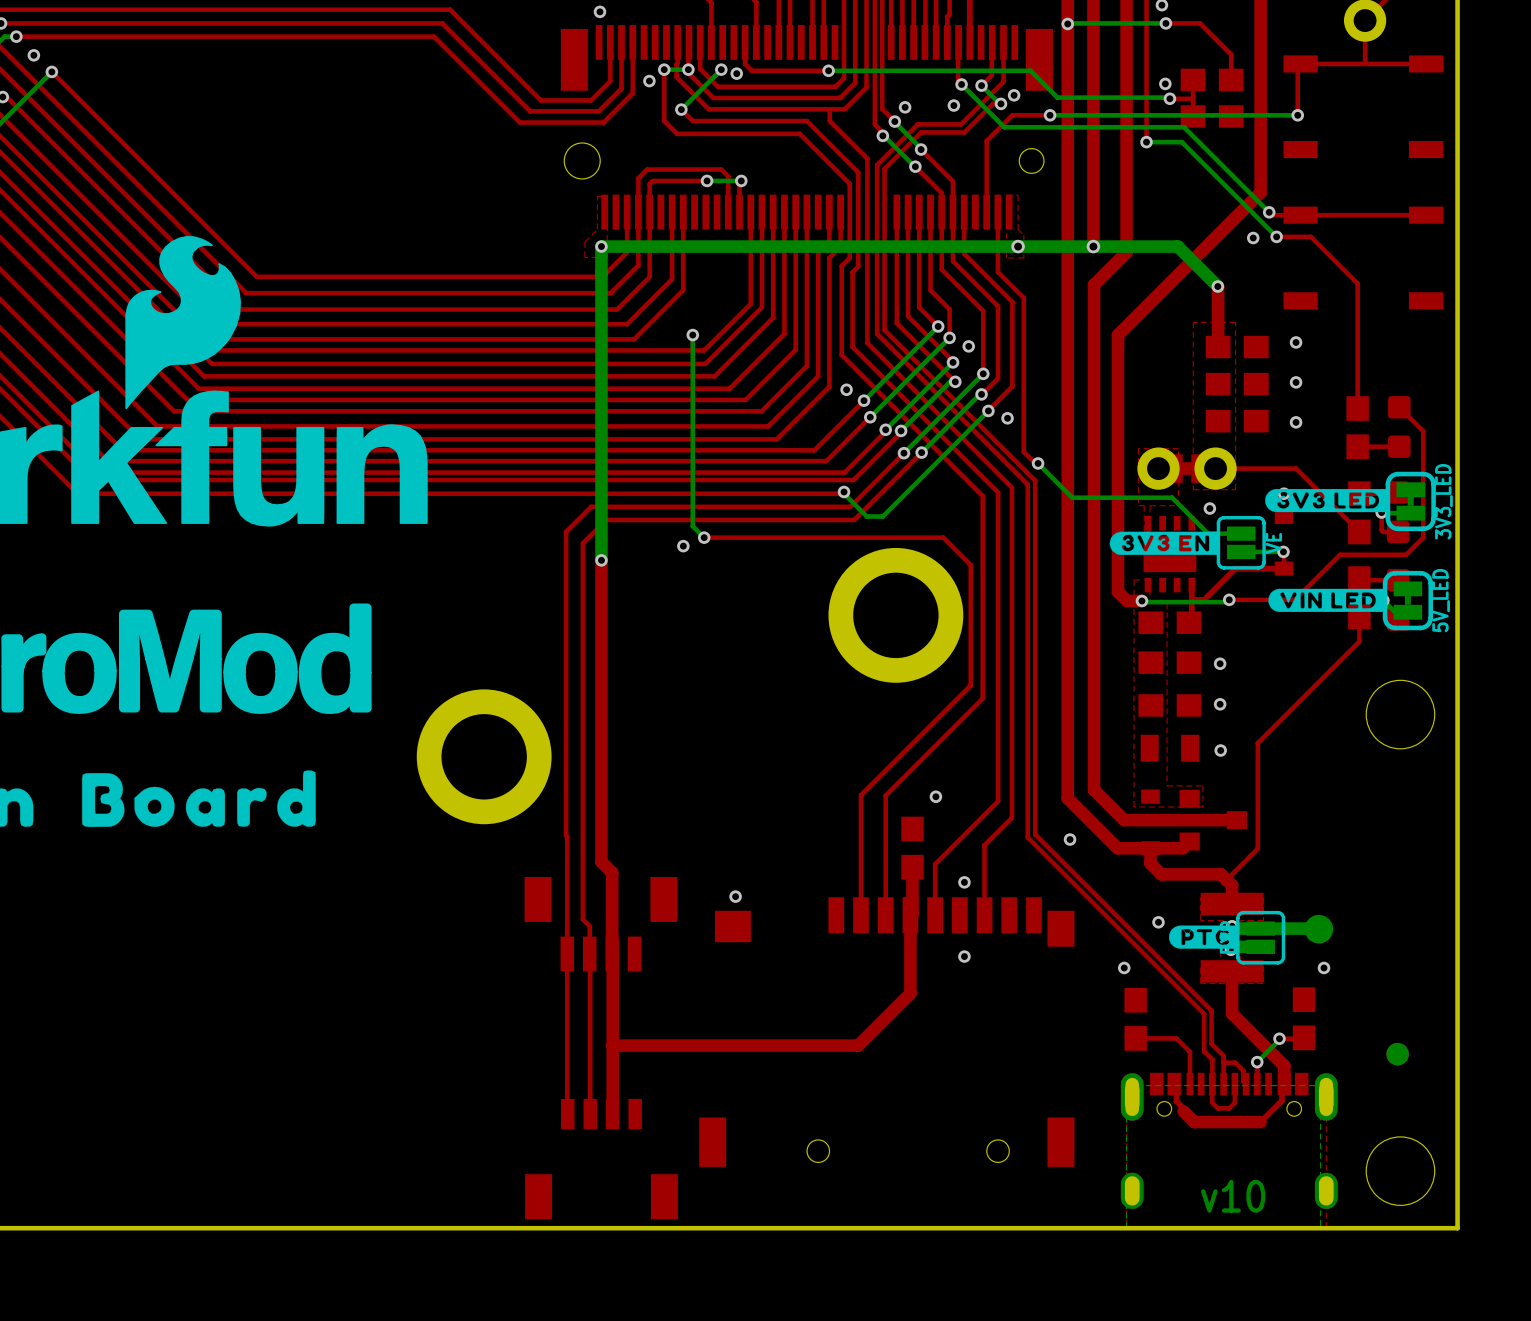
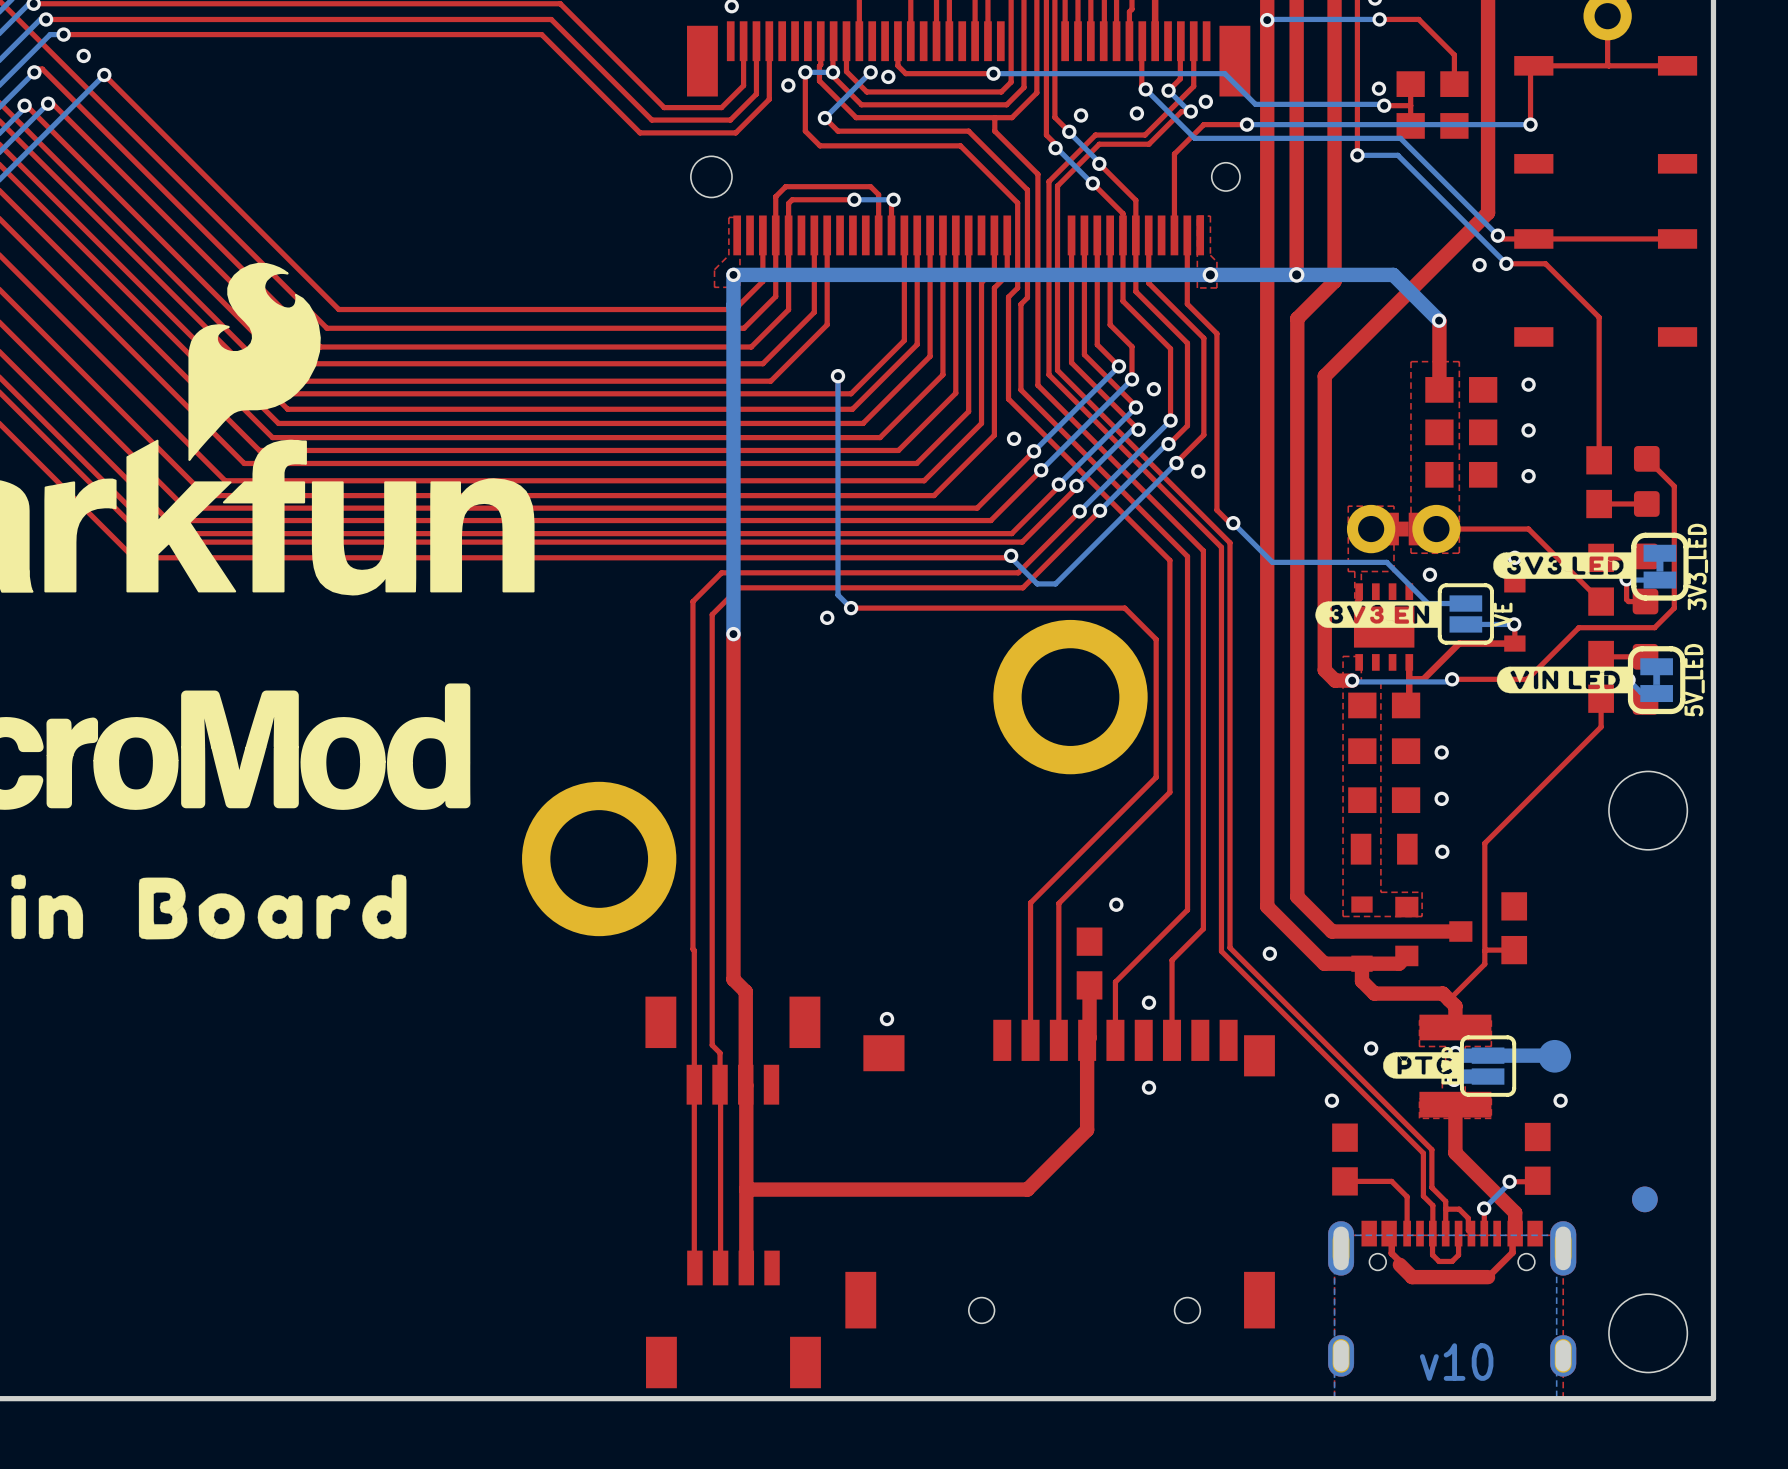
part: none -> (1514, 928)
top track: none -> (1514, 950) (1484, 951)

